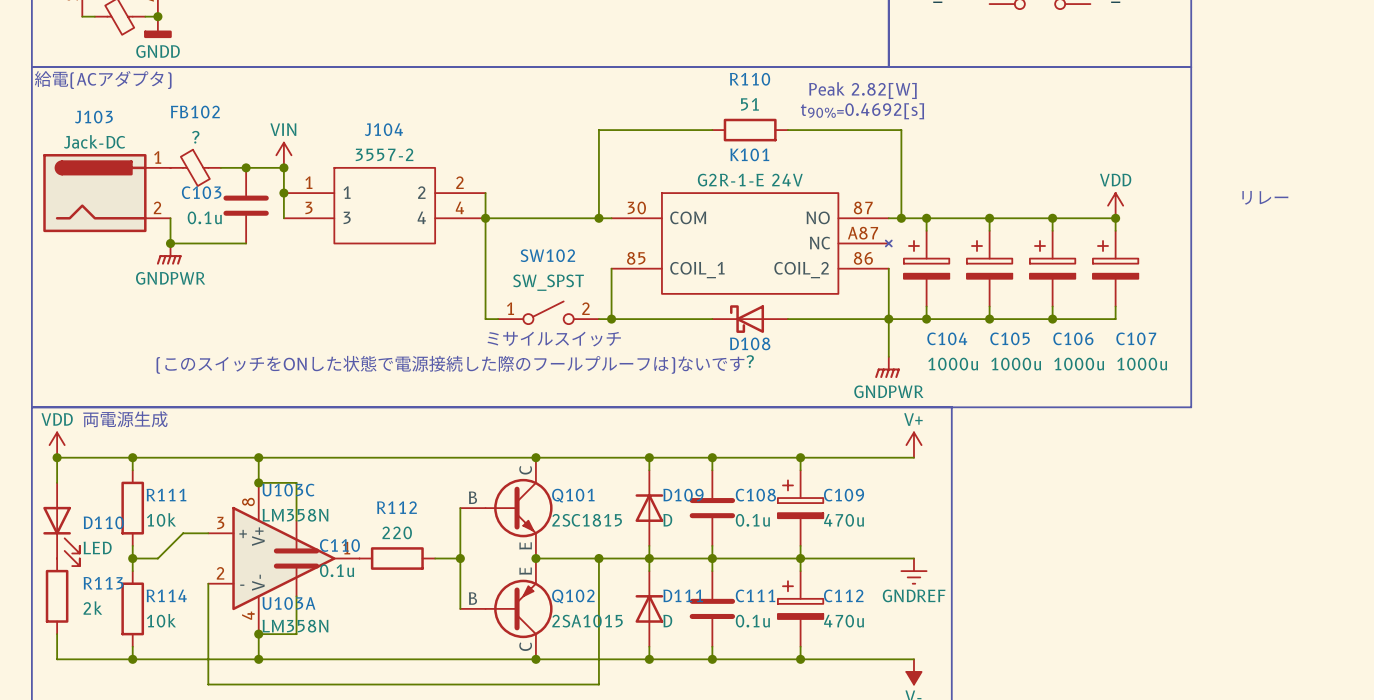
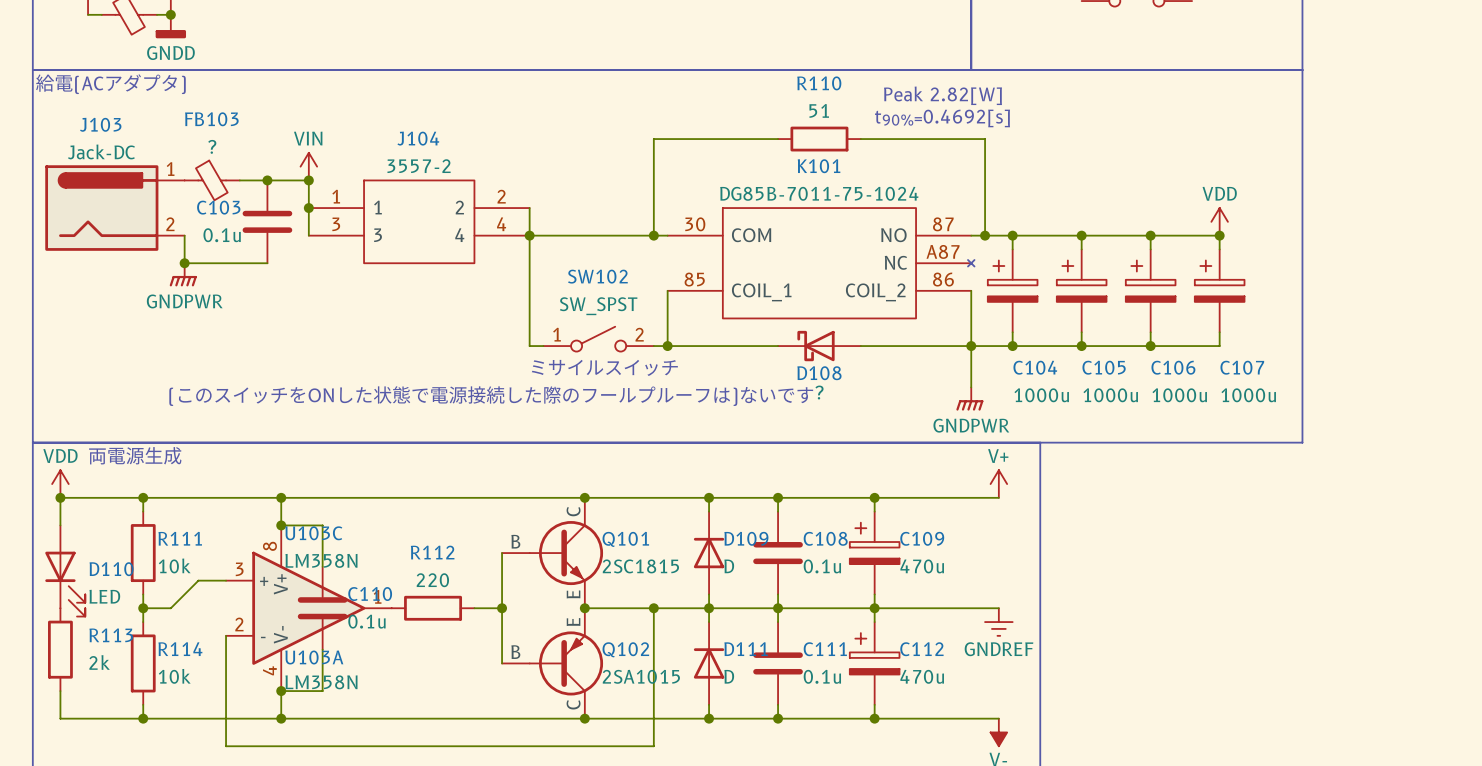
FB102 name: FB102 (195, 112) -> FB103 (211, 119)
K101 value: G2R-1-E 24V (750, 180) -> DG85B-7011-75-1024 (819, 193)
text: リレー (1265, 197) -> none

